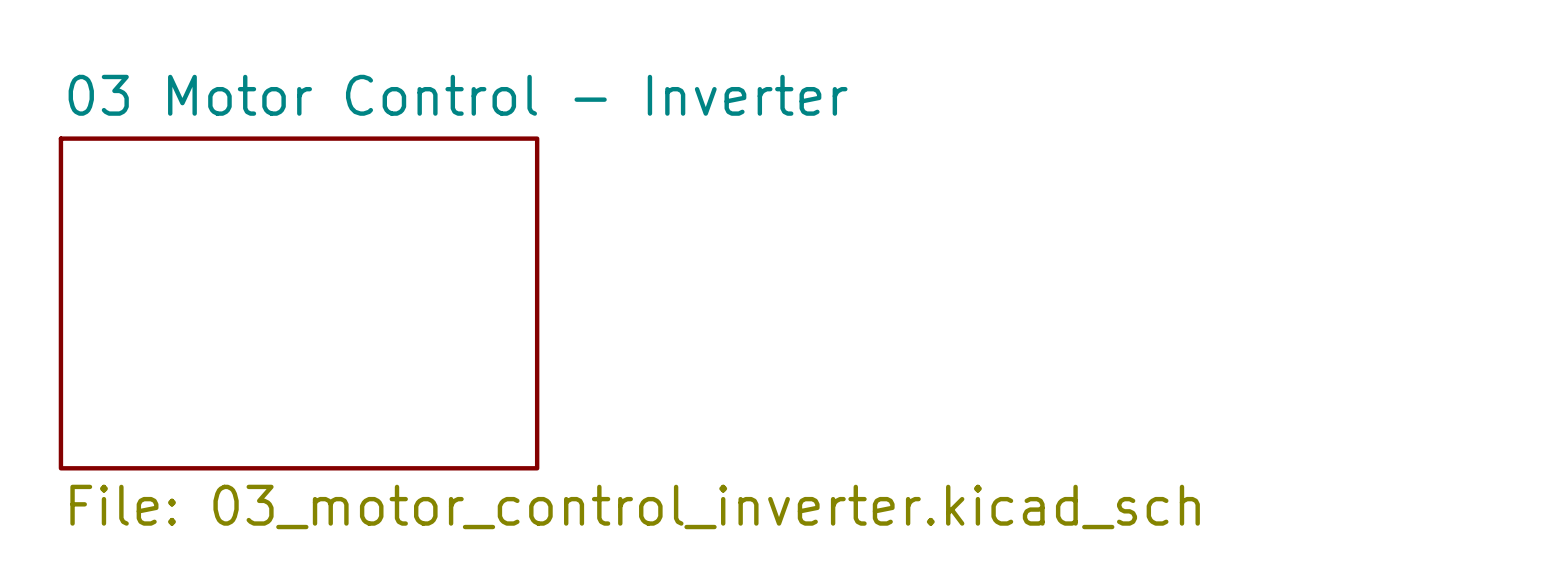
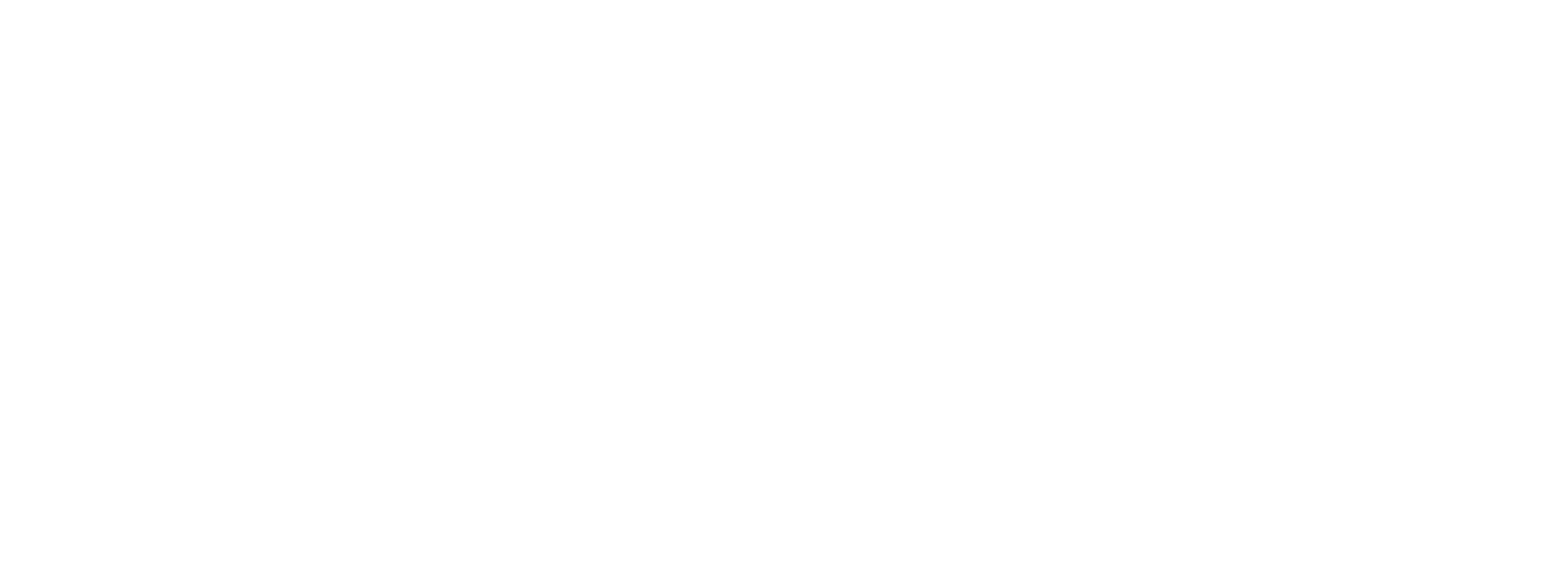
sheet 03 Motor Control - Inverter: File: 03_motor_control_inverter.kicad_sch (299, 303) -> none

